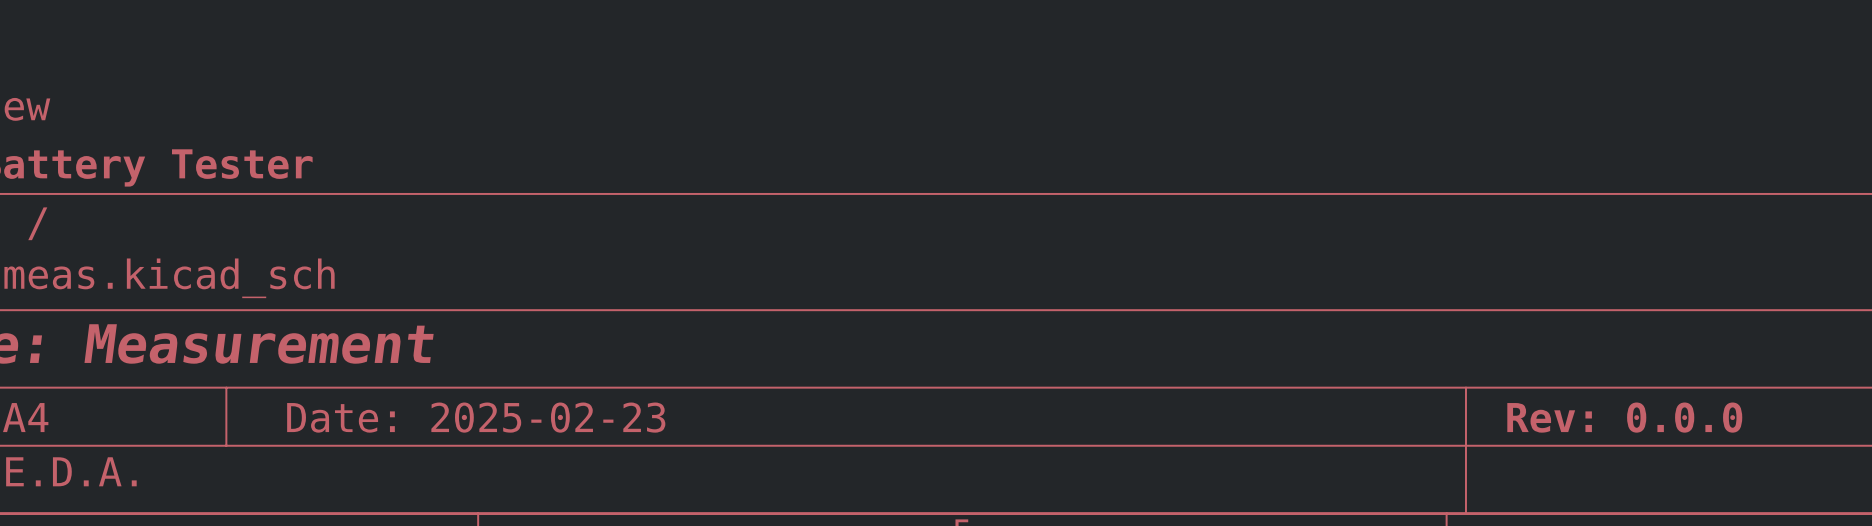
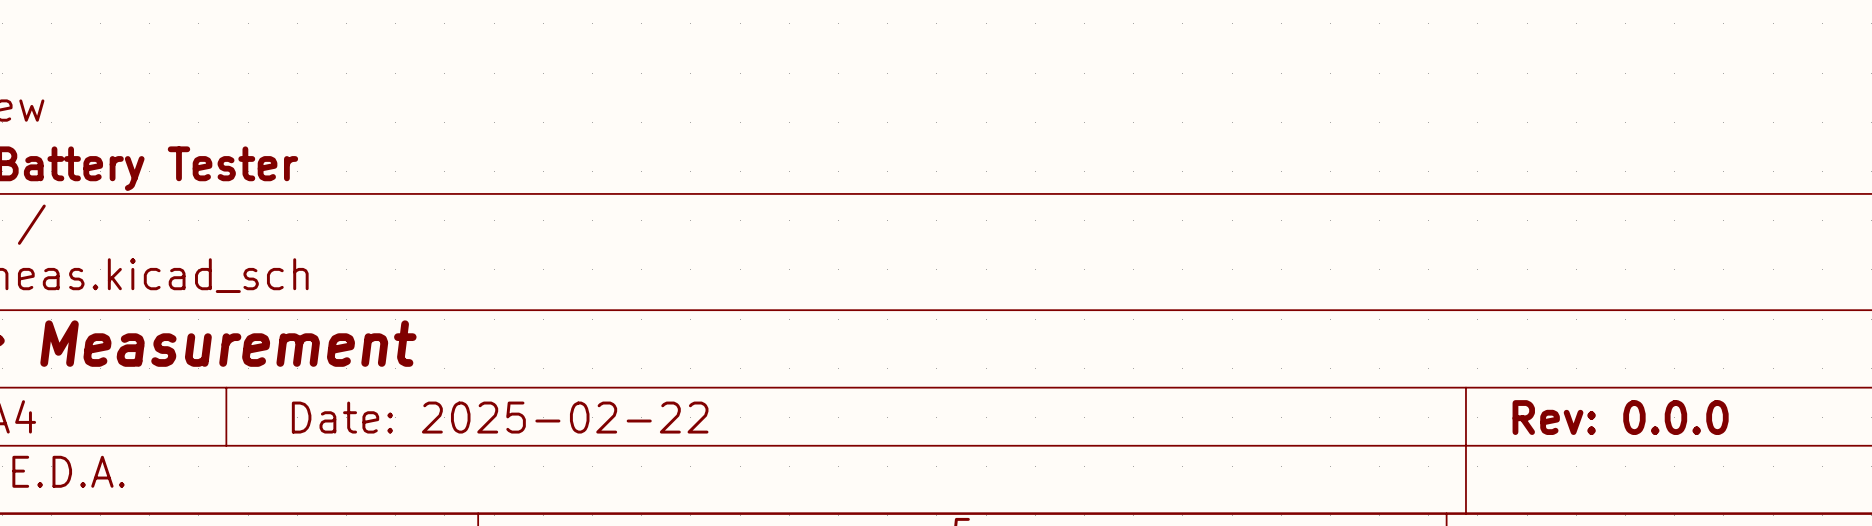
title block: Date: 2025-02-23 (476, 417) -> Date: 2025-02-22 (500, 417)

